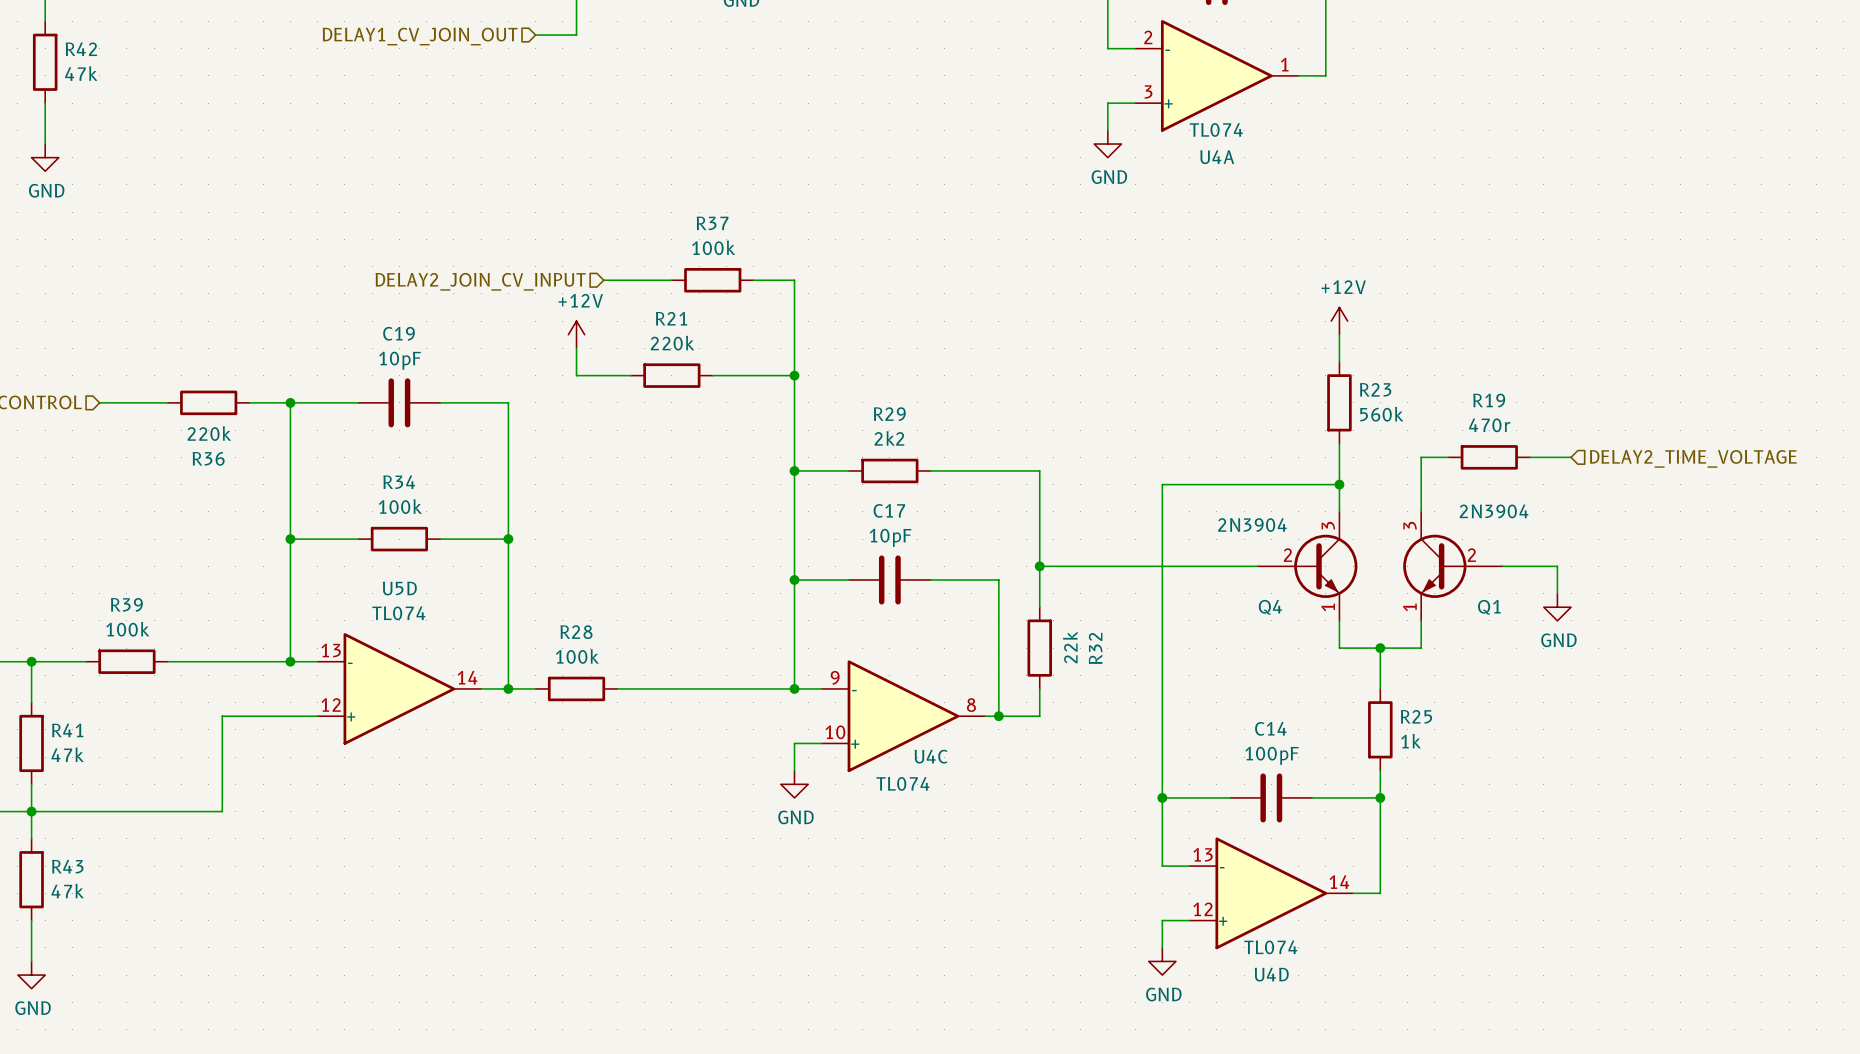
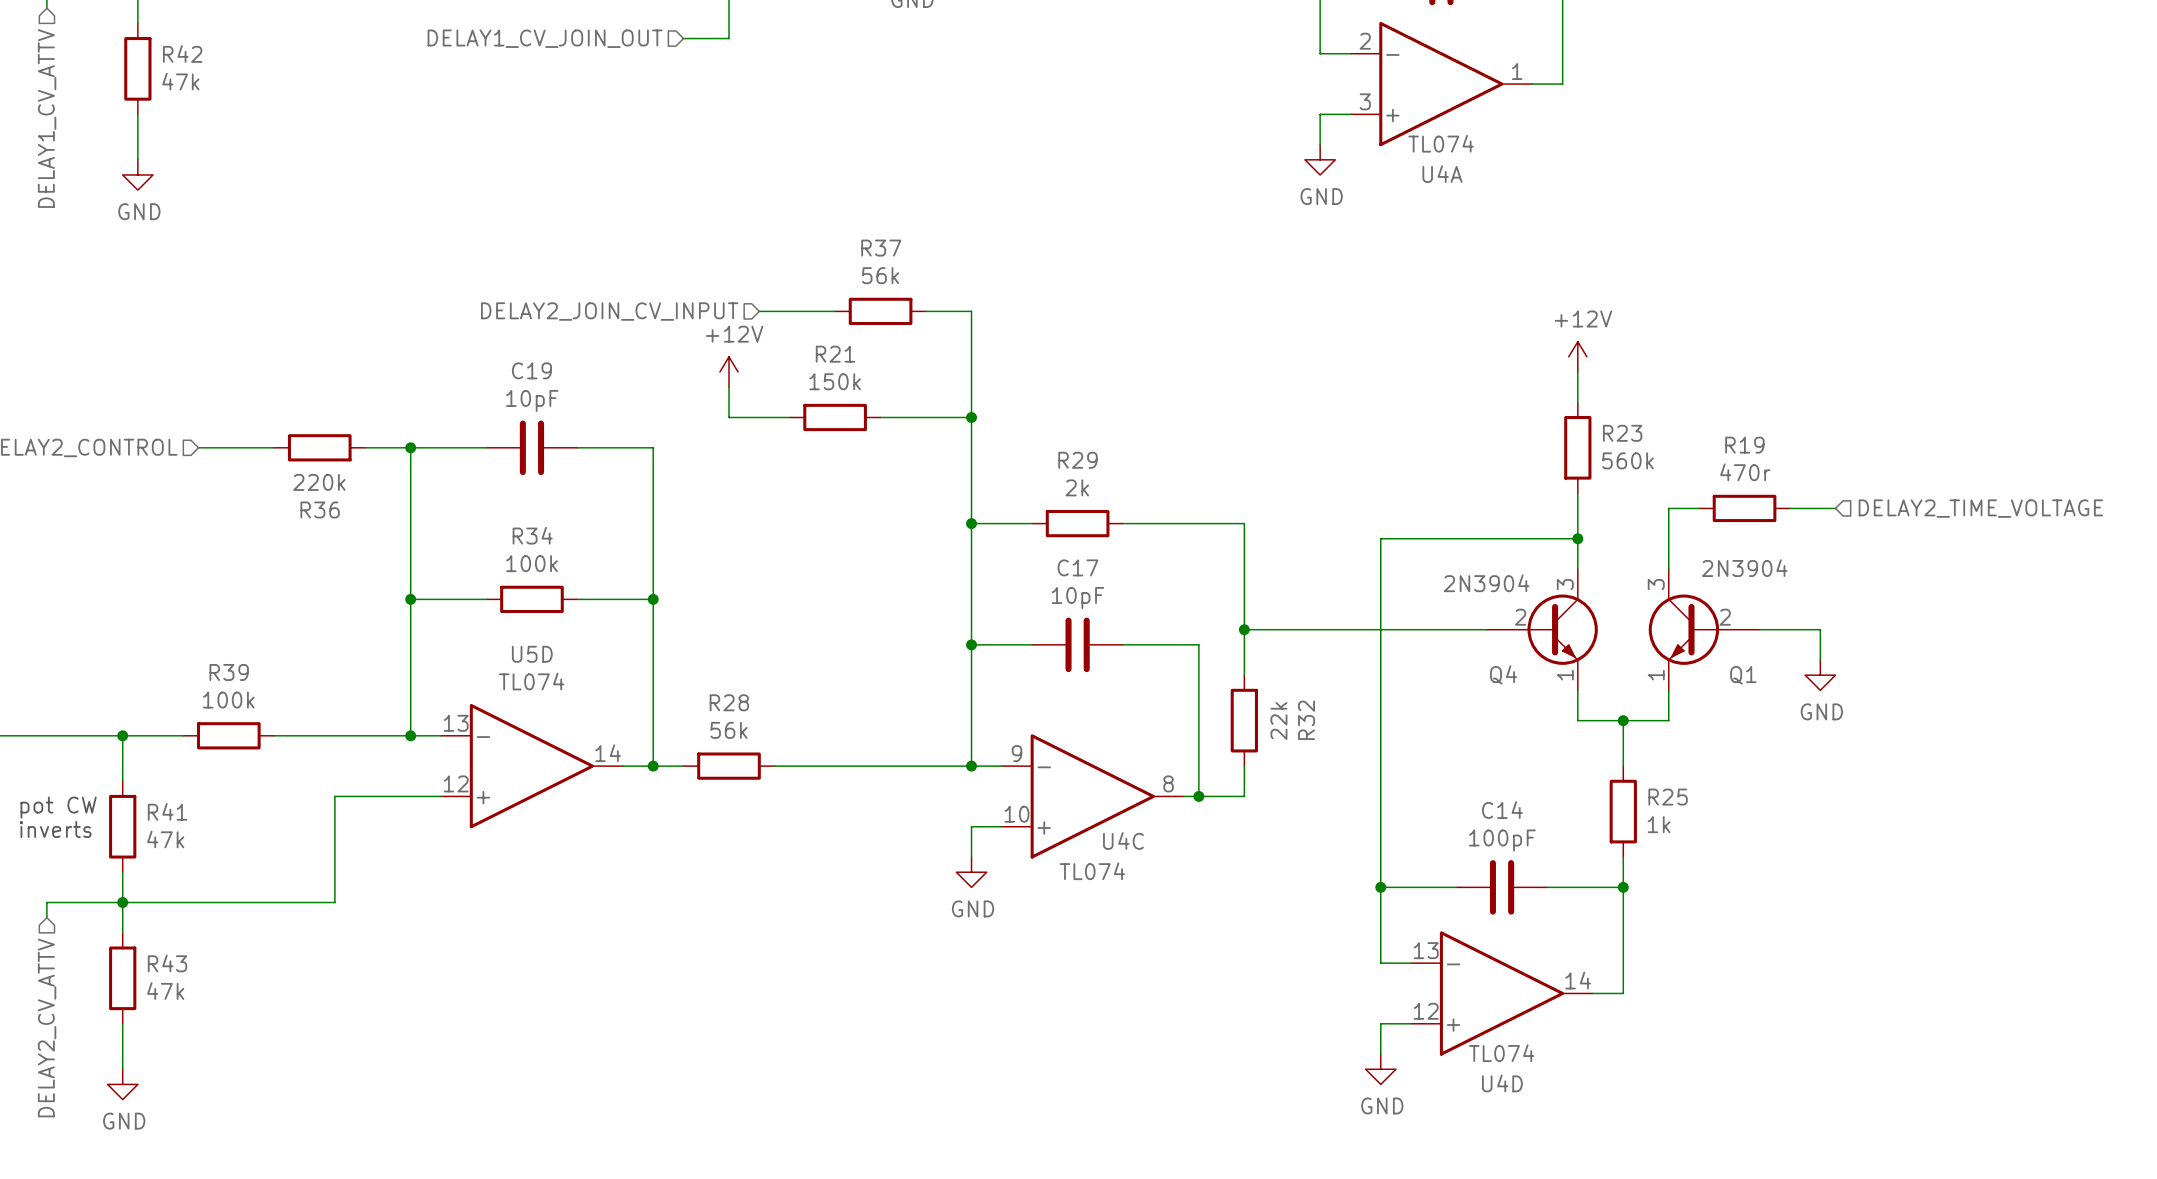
R37 value: 100k (713, 247) -> 56k (880, 275)
R21 value: 220k (672, 343) -> 150k (835, 381)
R29 value: 2k2 (889, 438) -> 2k (1077, 487)
R28 value: 100k (577, 656) -> 56k (729, 730)

